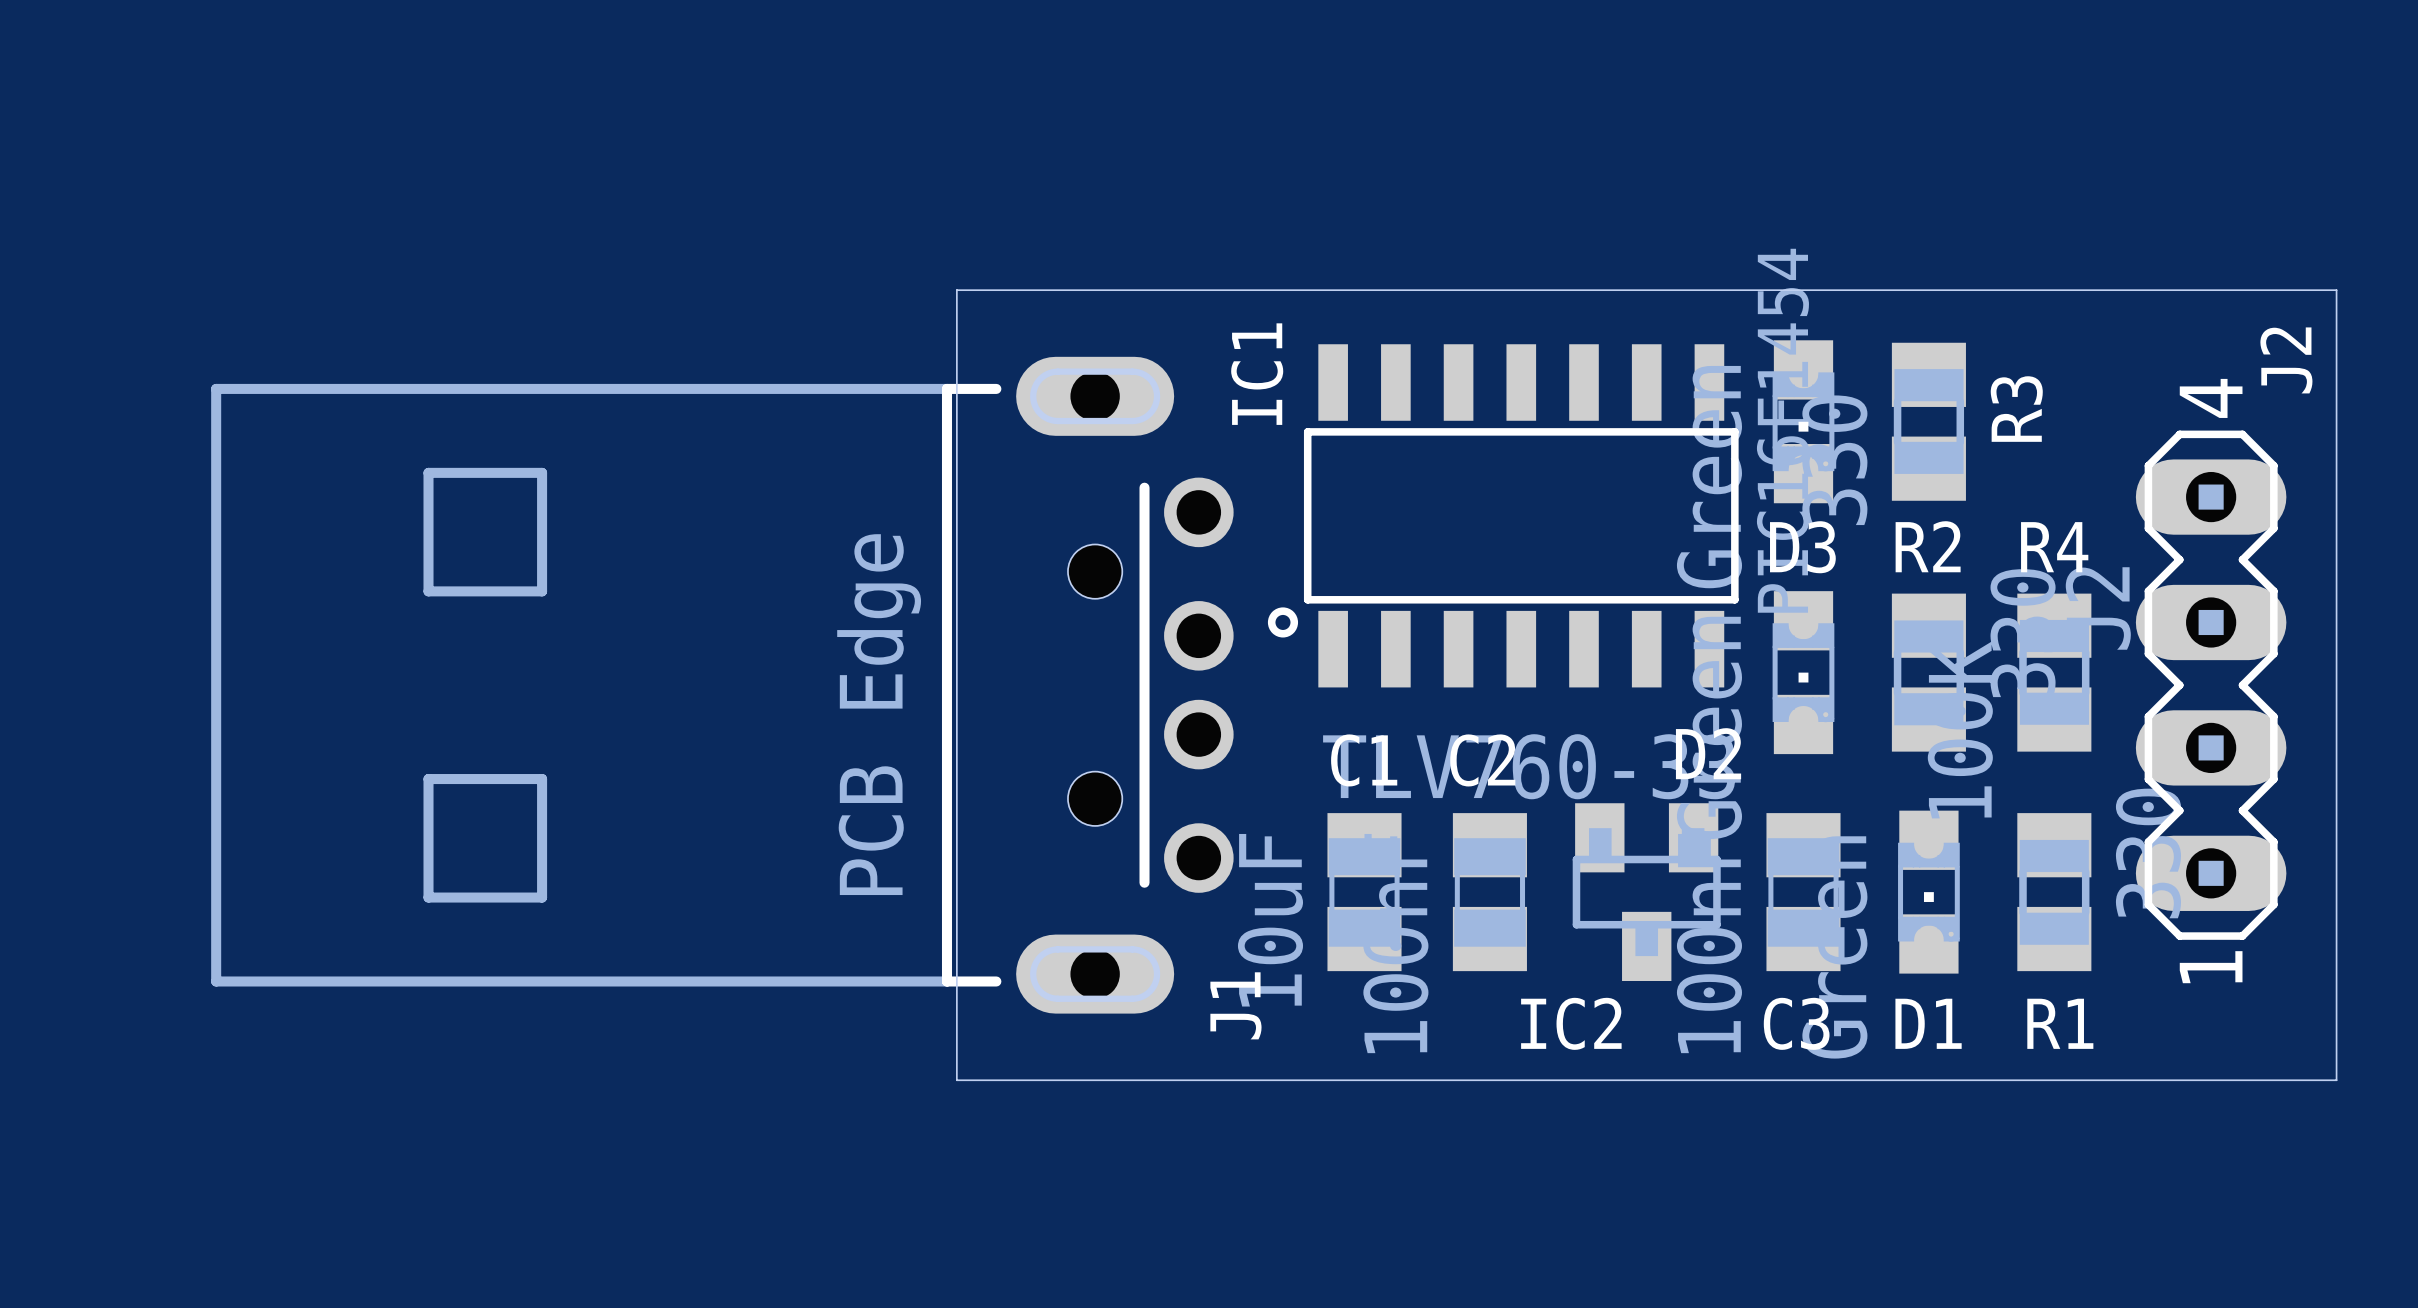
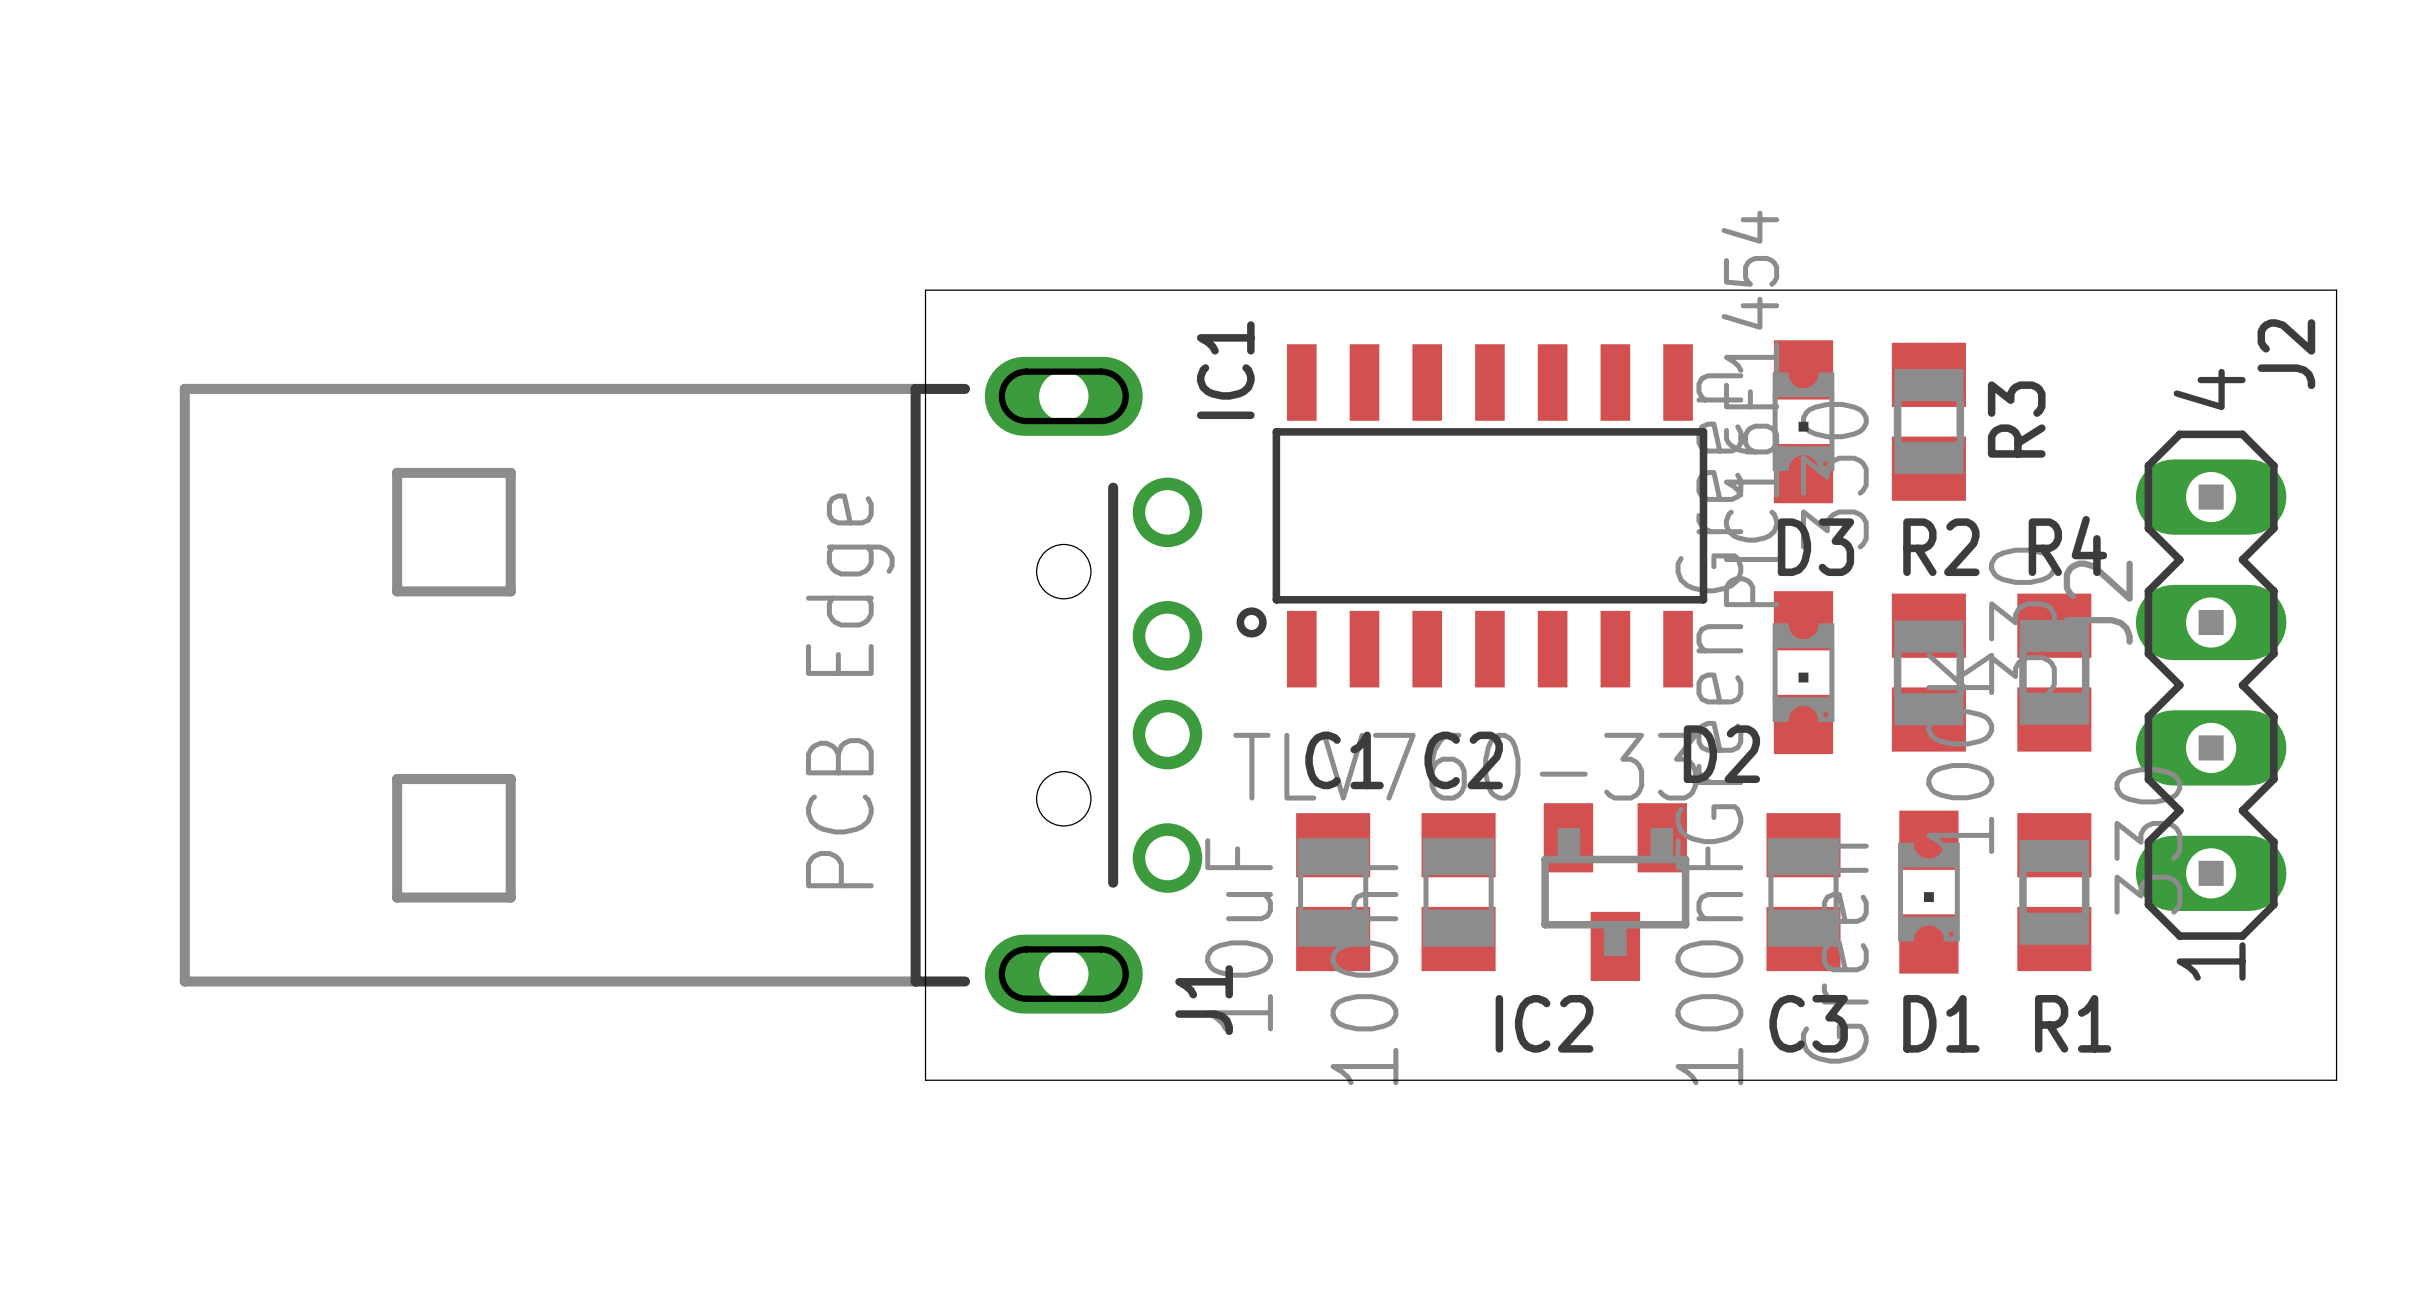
board edge: (956, 290) (956, 1080) -> (956, 290) (925, 290) (925, 1080) (956, 1080)
IC1 position: (1503, 515) -> (1471, 515)
J1 position: (722, 685) -> (691, 685)
C1 position: (1364, 892) -> (1333, 892)
C2 position: (1489, 892) -> (1458, 892)
IC2 position: (1646, 892) -> (1615, 892)

